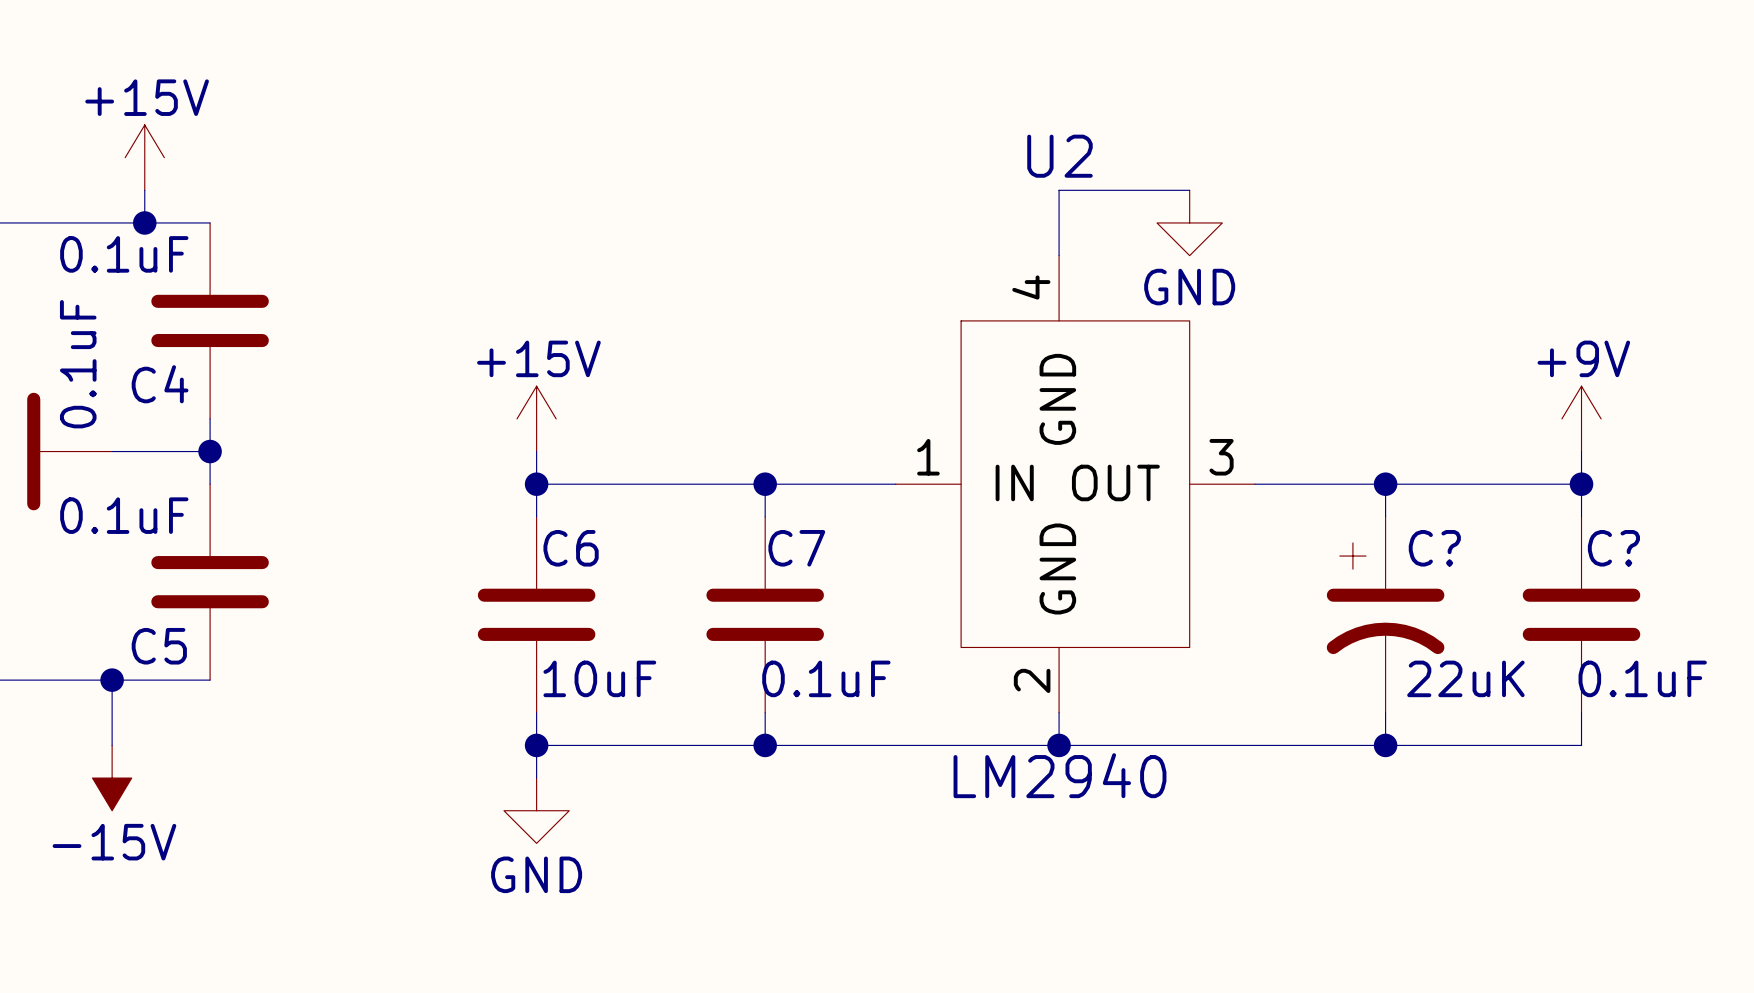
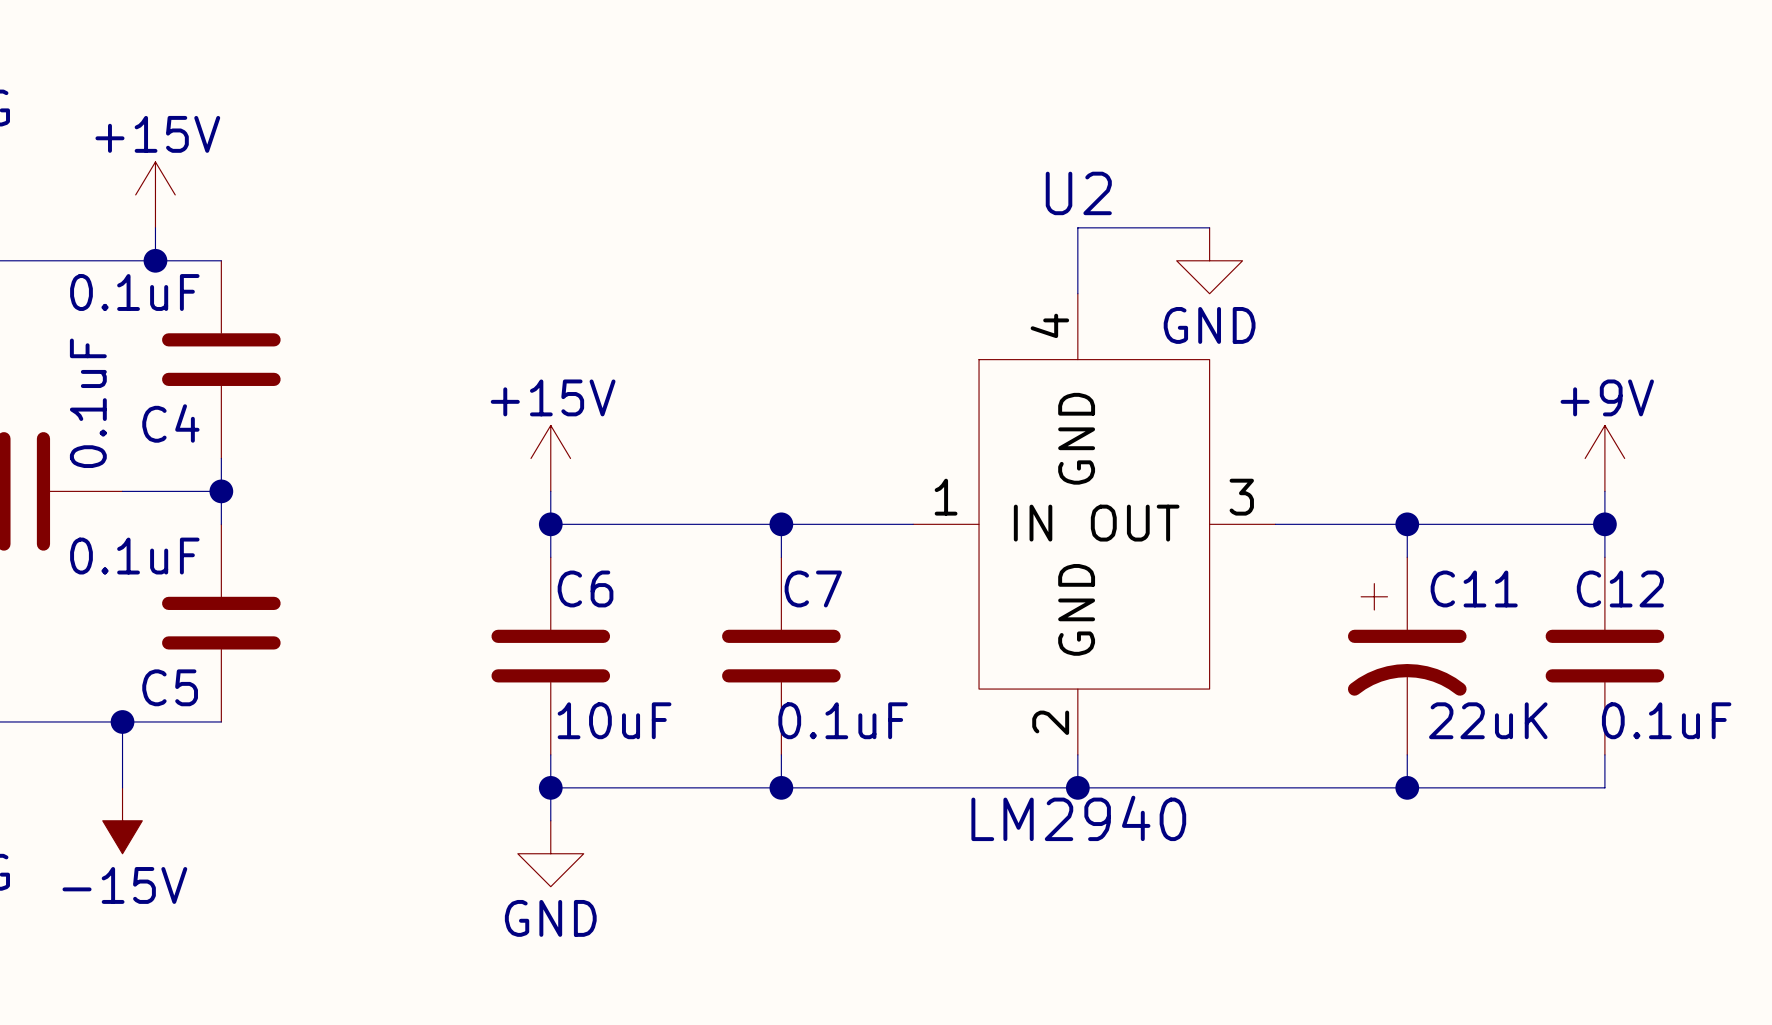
C? name: C? (1434, 548) -> C11 (1474, 588)
C? name: C? (1613, 548) -> C12 (1620, 588)

